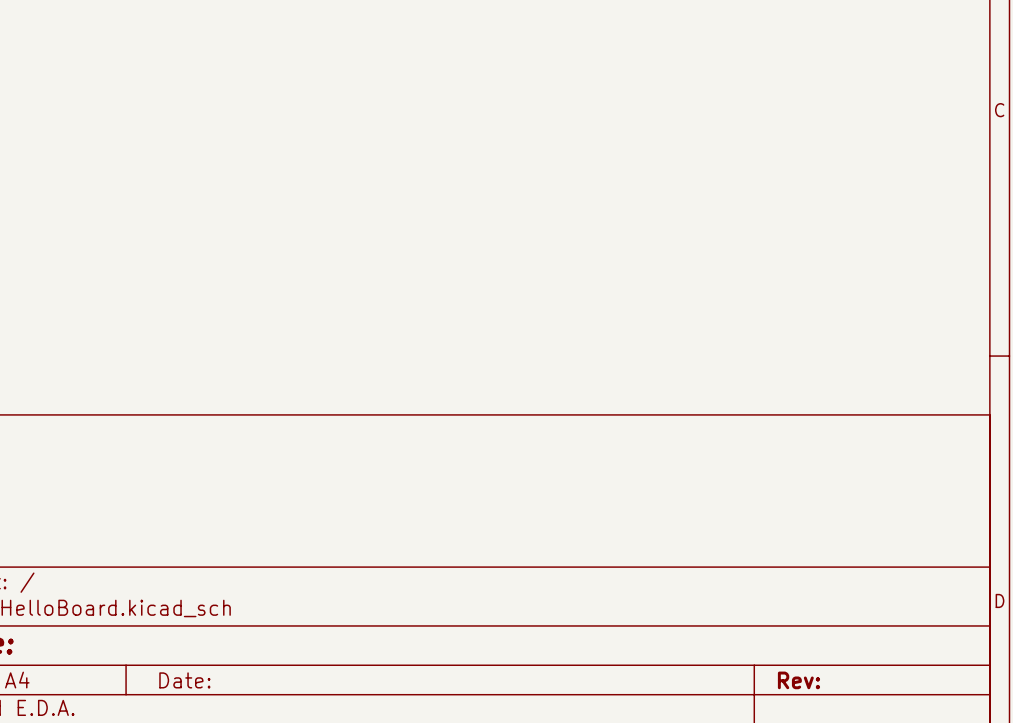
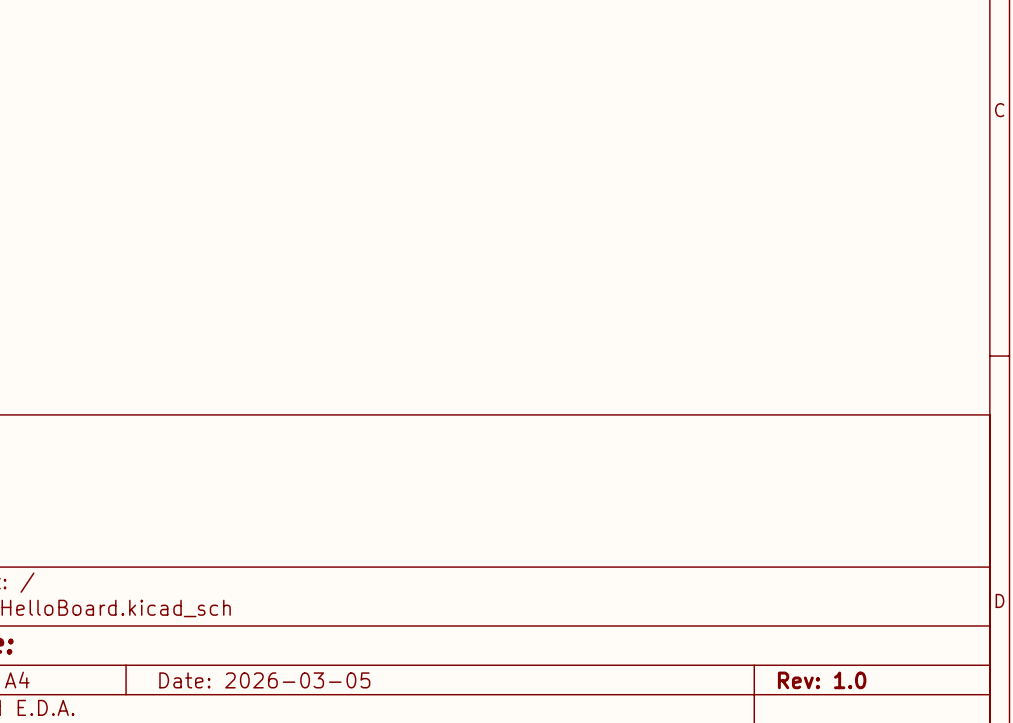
title block: Date: (184, 680) -> Date: 2026-03-05 (264, 680)
title block: Rev: (798, 680) -> Rev: 1.0 (822, 680)

